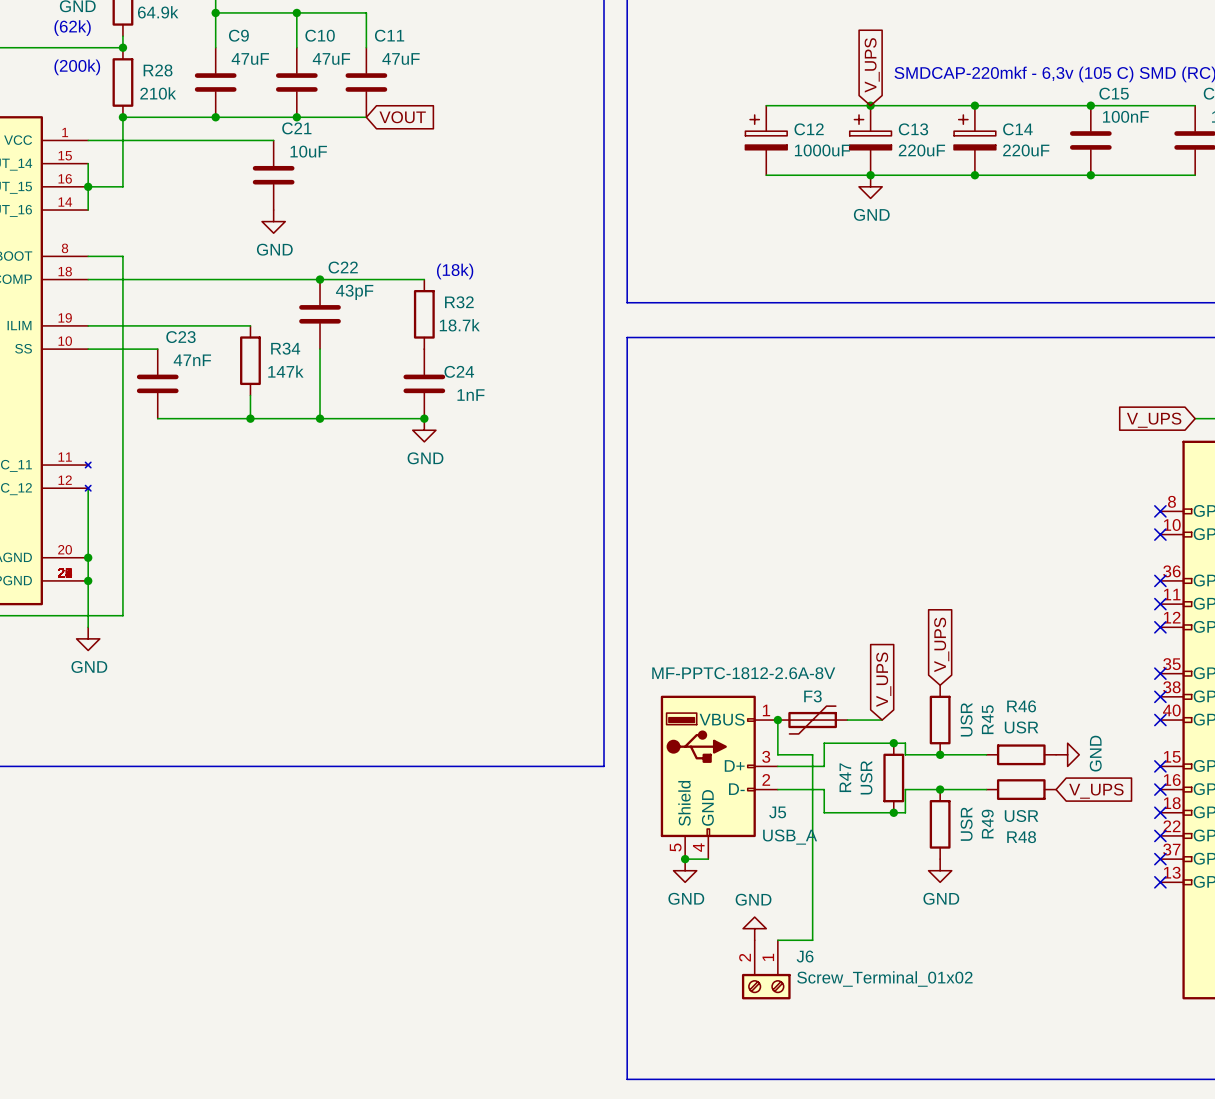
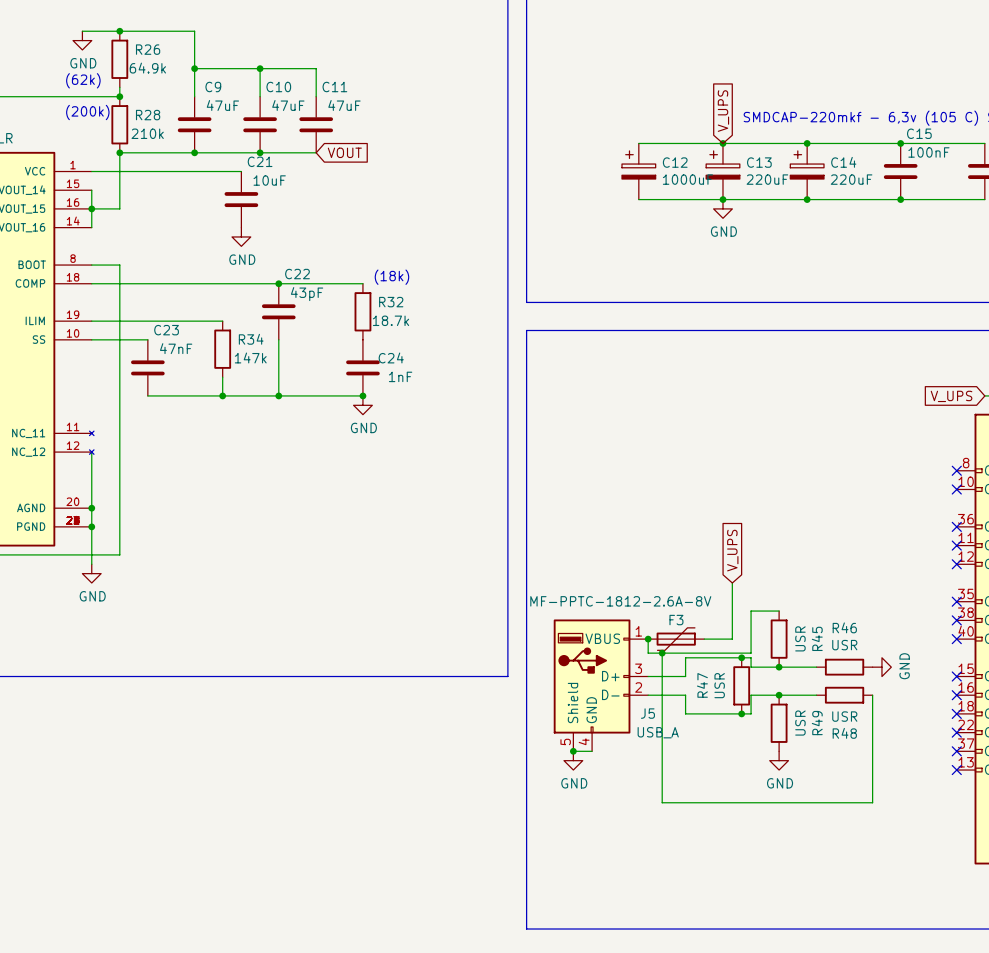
global label: V_UPS (941, 644) -> none
wire: none -> (732, 582) (732, 639)
global label position: V_UPS (883, 679) -> V_UPS (732, 550)
wire: (777, 737) (777, 754) (812, 754) (812, 940) (777, 940) -> (648, 653) (751, 653) (751, 611) (779, 611)
wire: none -> (662, 653) (662, 802) (872, 802) (872, 695)
junction: none -> (662, 653)
global label: V_UPS (1096, 791) -> none
power symbol: GND (754, 928) -> none
J6: Screw_Terminal_01x02 (766, 969) -> none

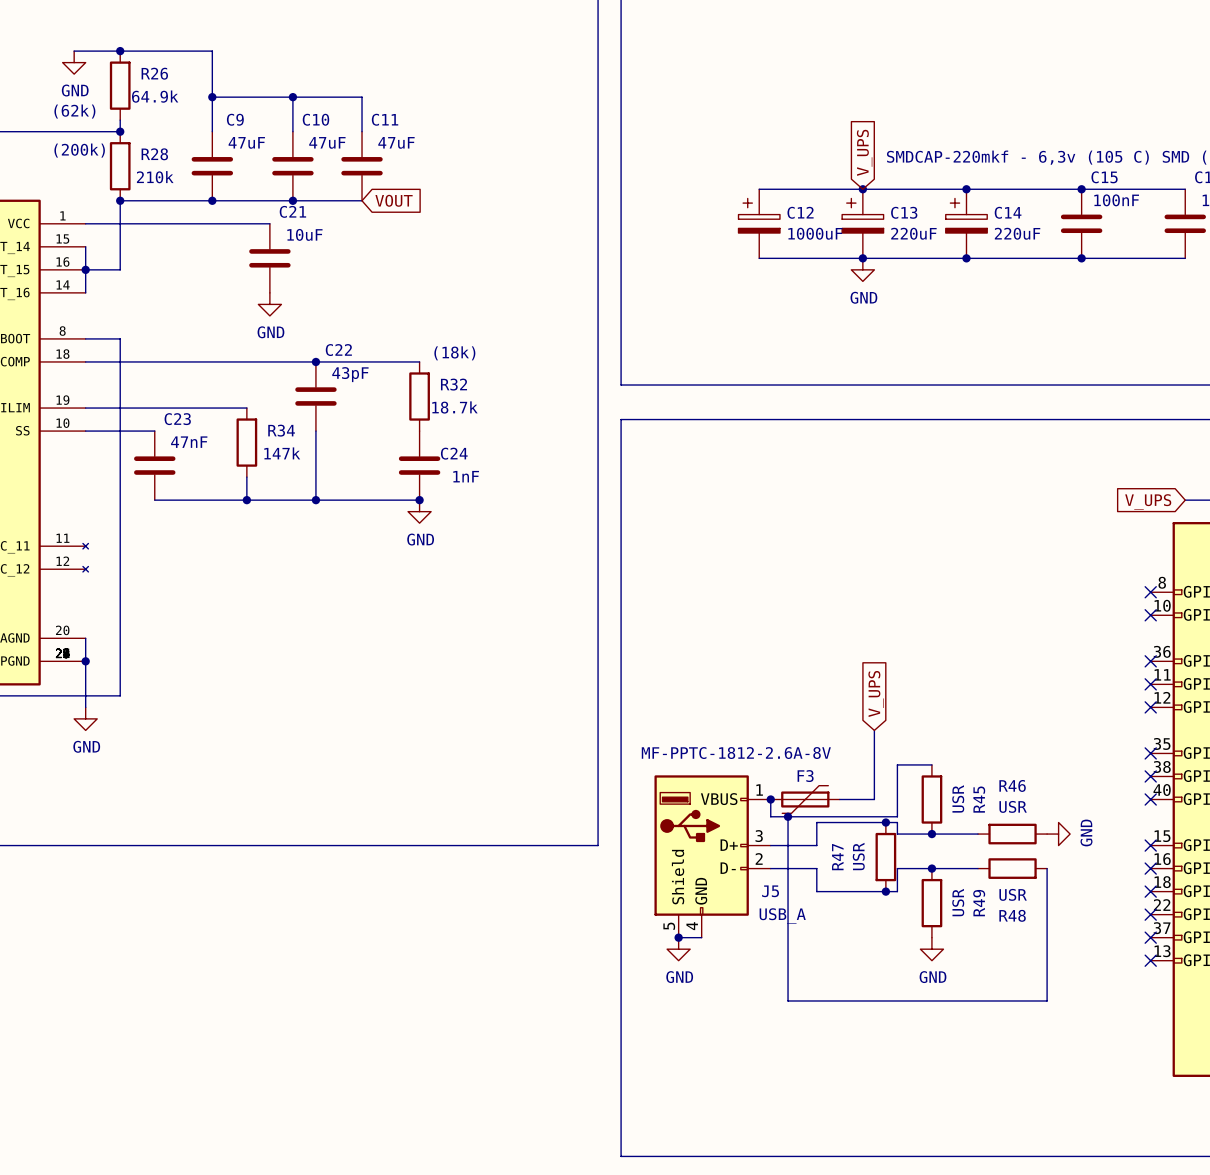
wire: (91, 452) (91, 508) -> none
junction: (91, 508) -> none

